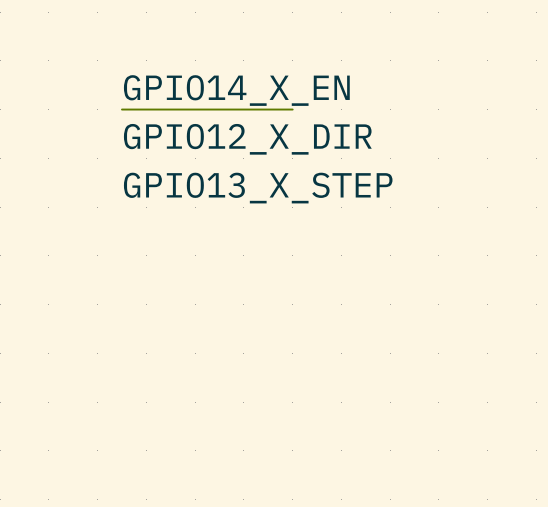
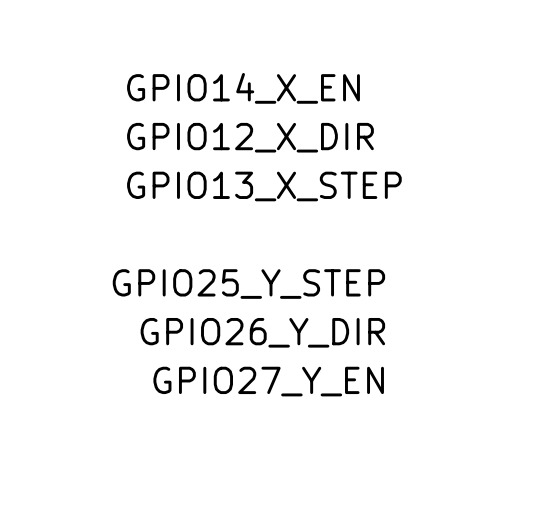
wire: (121, 109) (292, 109) -> none
label: none -> GPIO25_Y_STEP (248, 284)
label: none -> GPIO26_Y_DIR (262, 332)
label: none -> GPIO27_Y_EN (268, 381)

